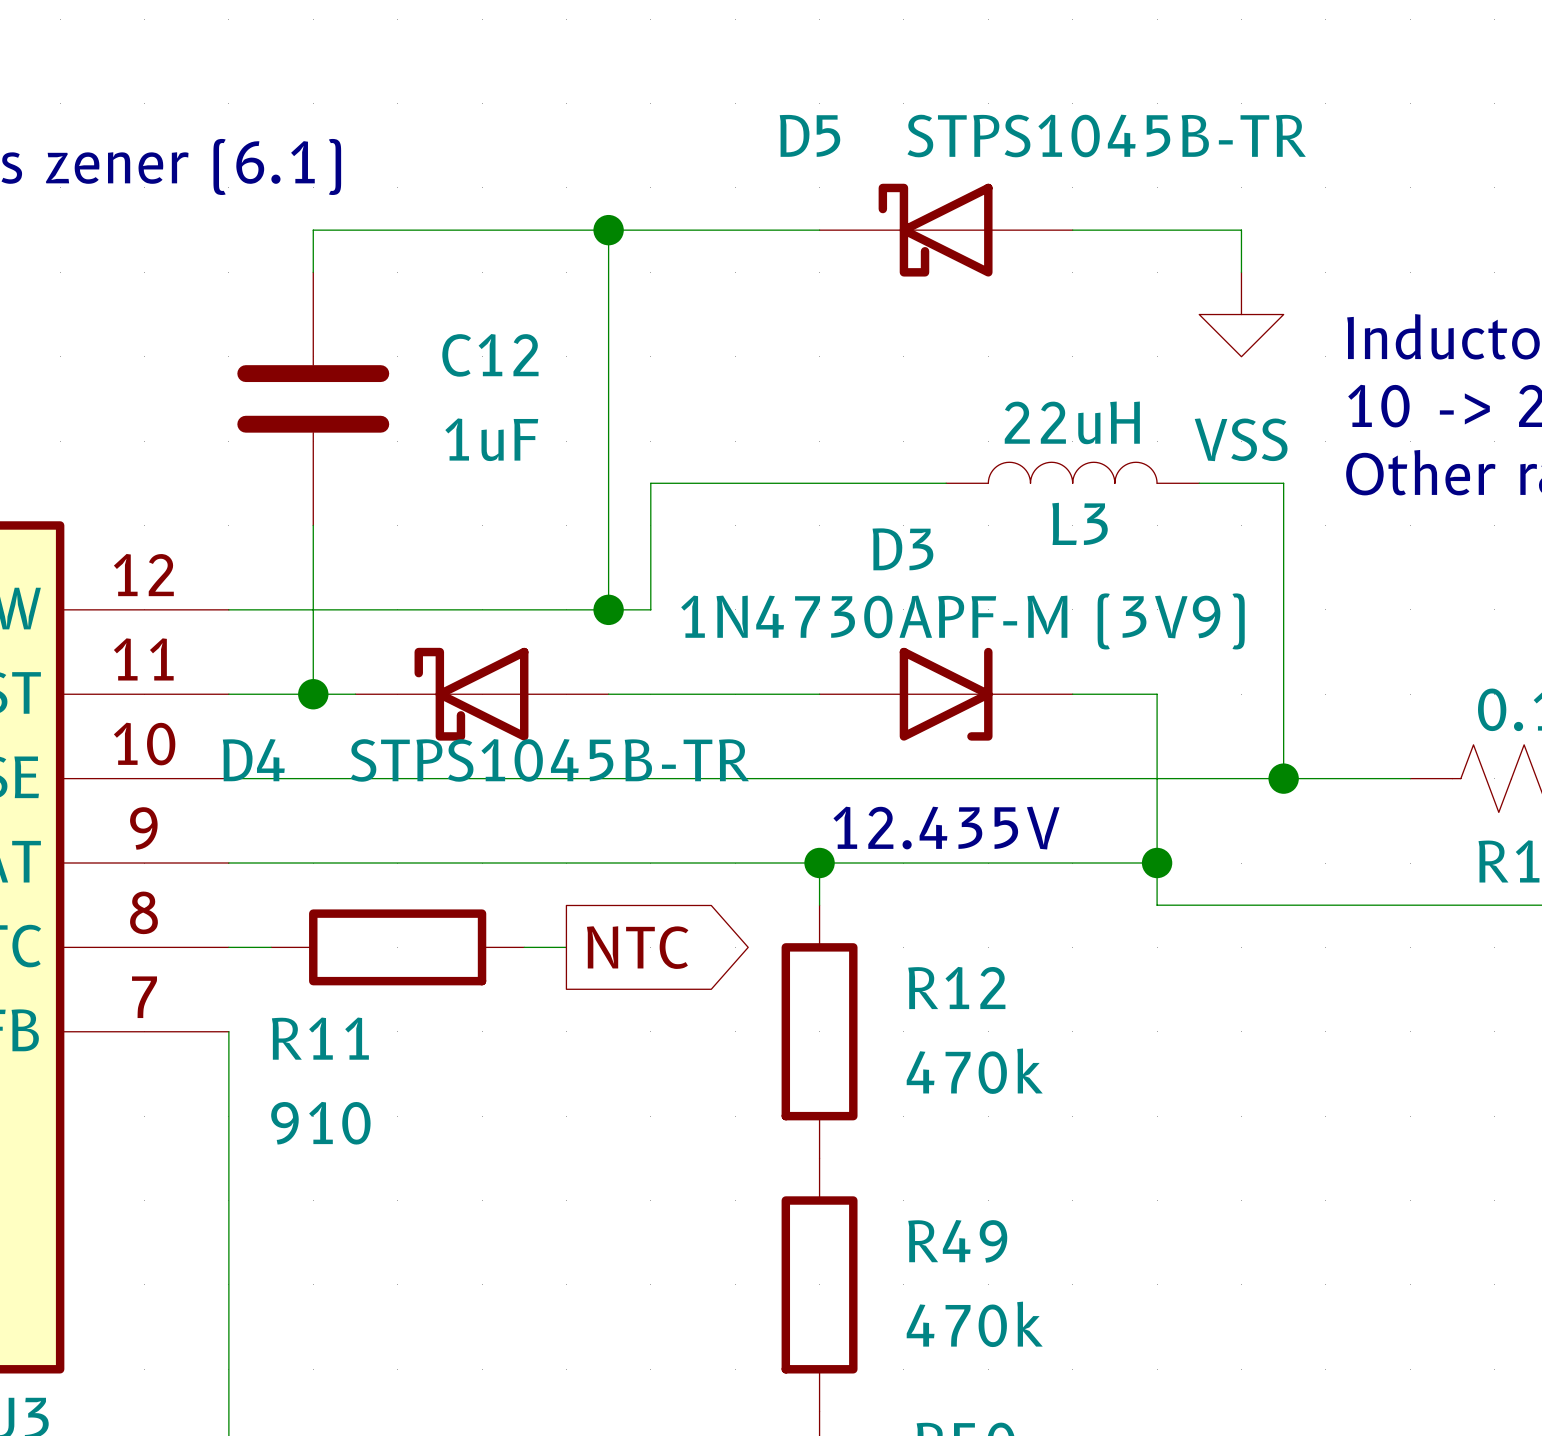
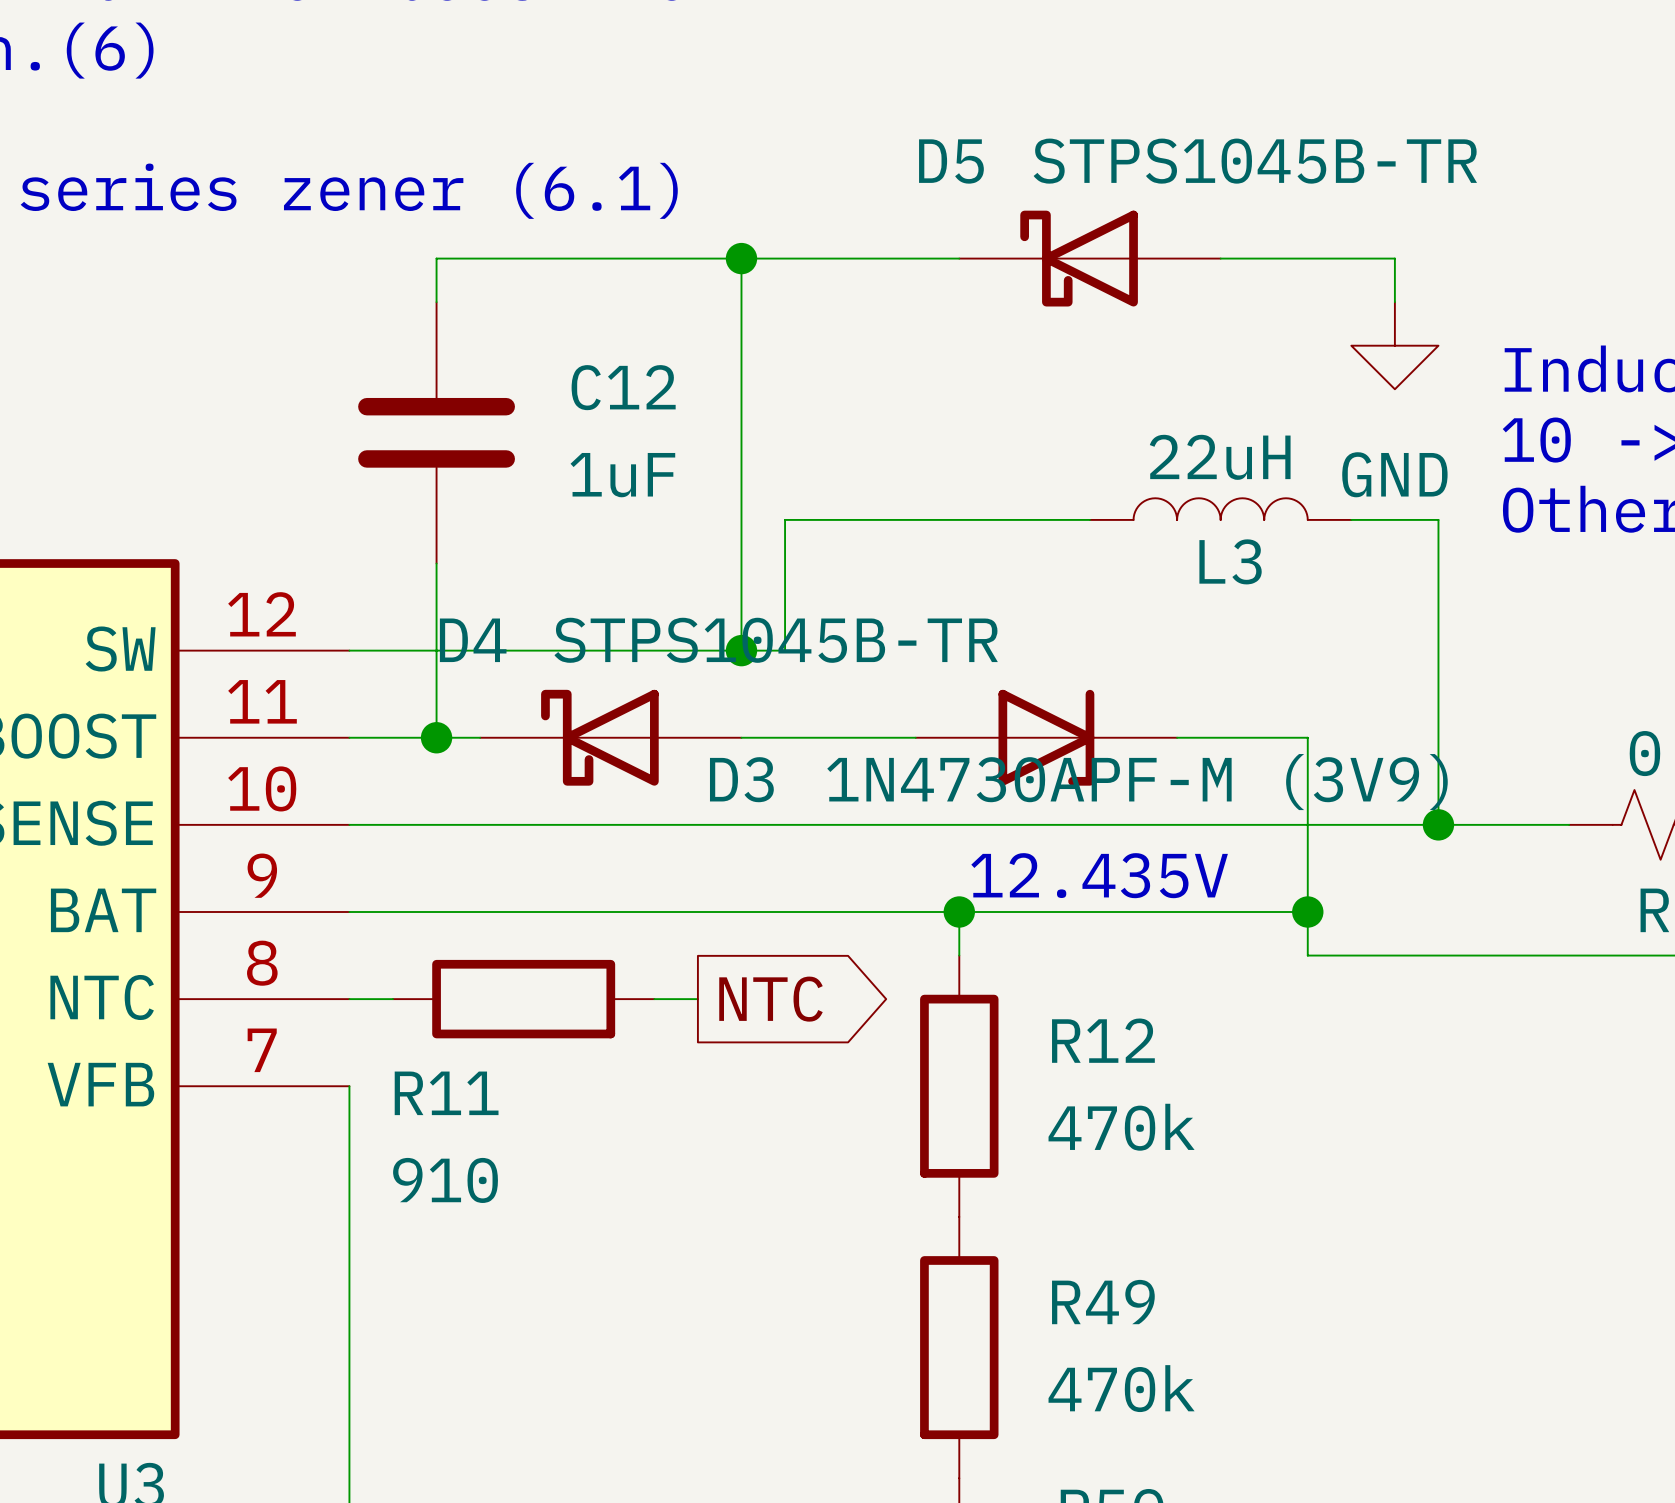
power symbol: VSS (1241, 314) -> GND (1394, 345)
D3 name position: D3 (902, 549) -> D3 (741, 779)
D3 value position: 1N4730APF-M (3V9) (962, 621) -> 1N4730APF-M (3V9) (1137, 782)
D3 position: (946, 694) -> (1046, 737)
D4 name position: D4 (253, 760) -> D4 (473, 640)
D4 value position: STPS1045B-TR (549, 760) -> STPS1045B-TR (776, 640)

